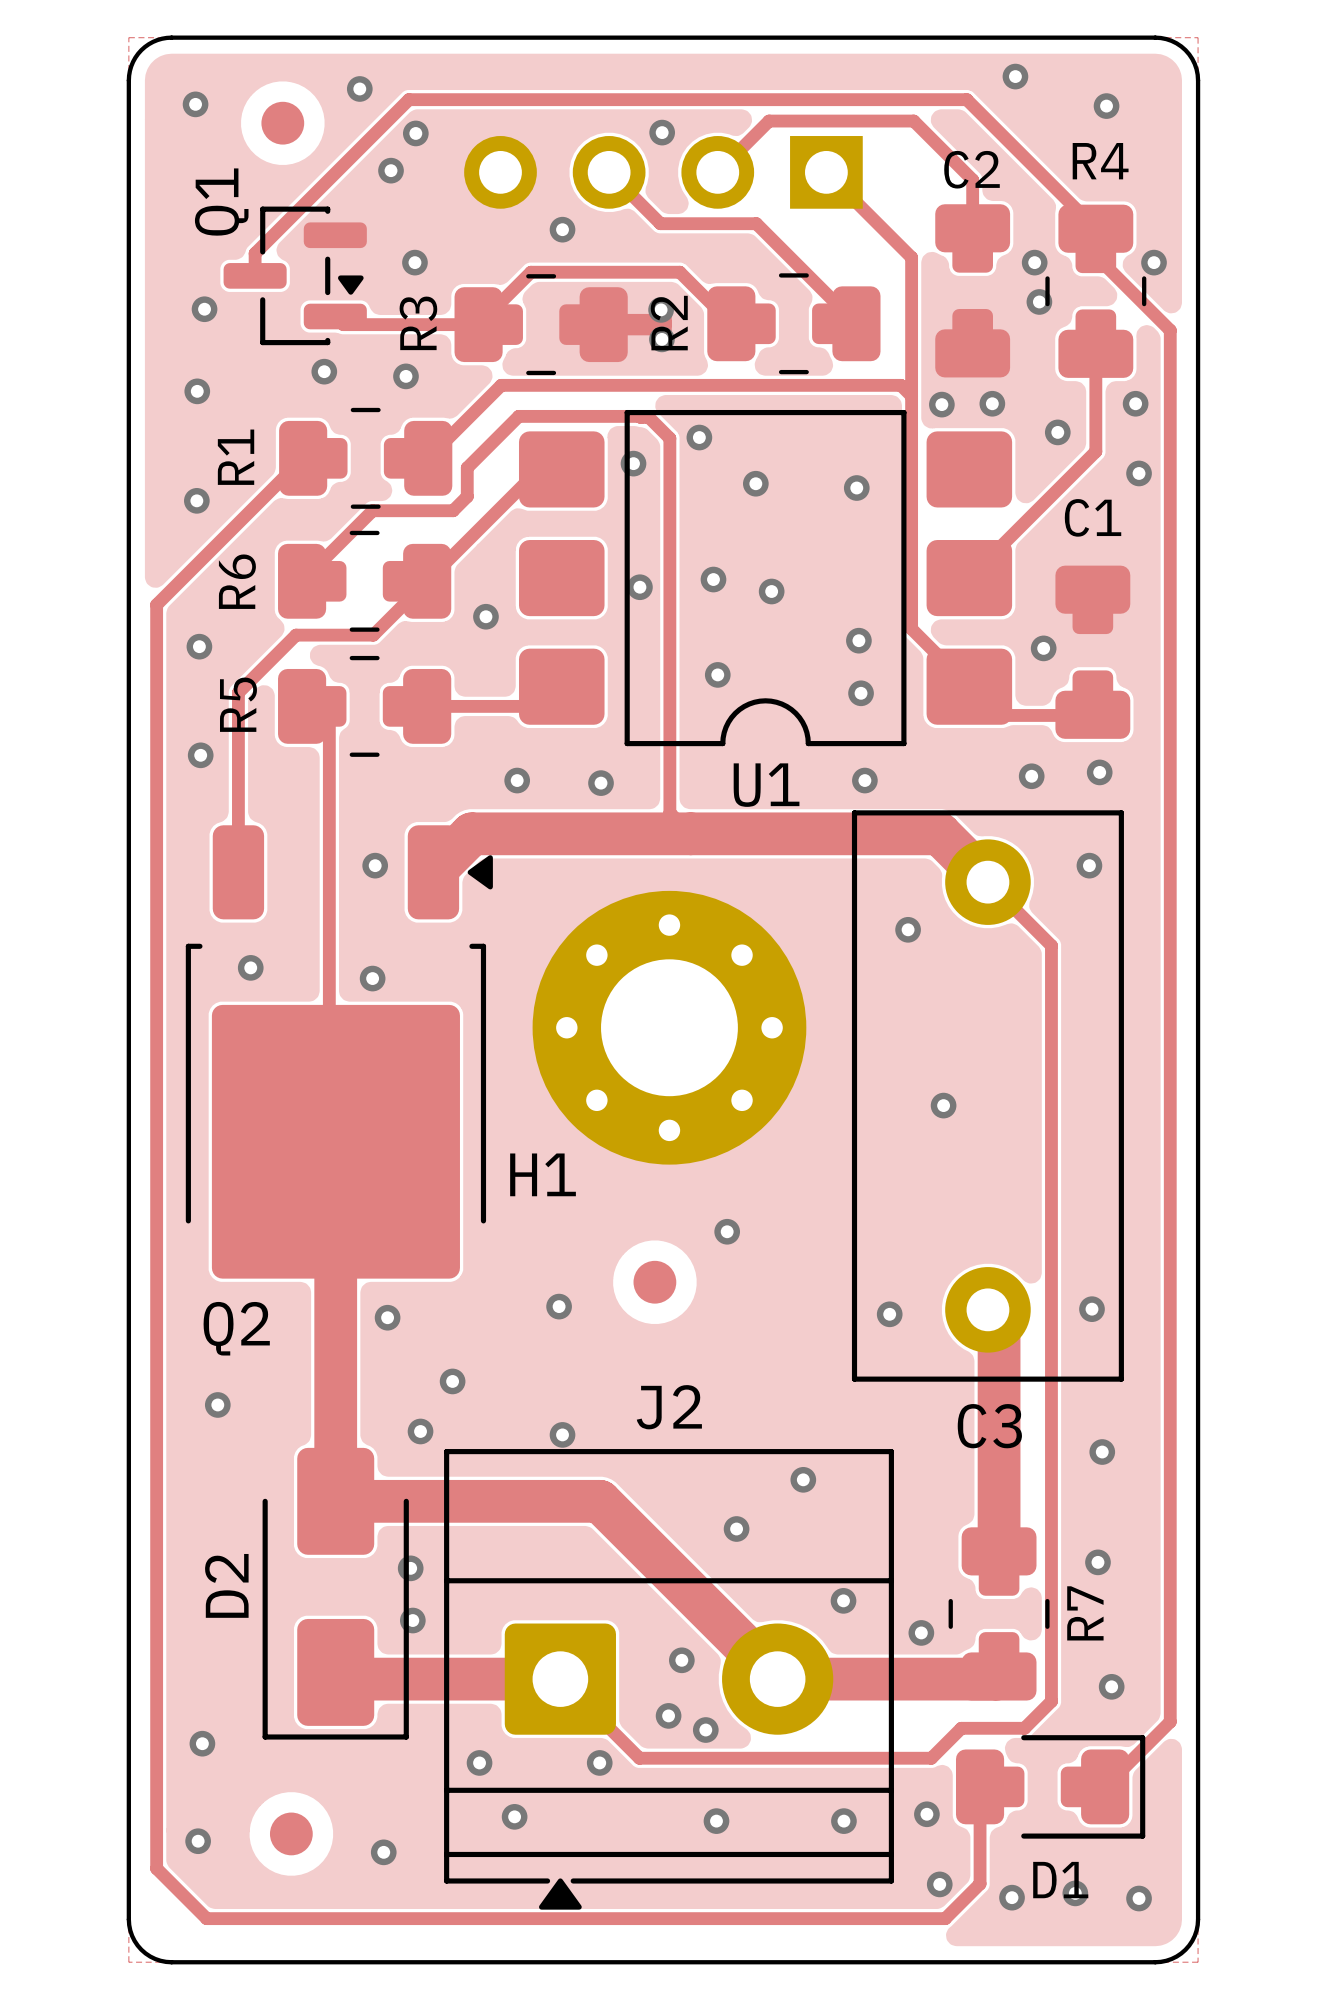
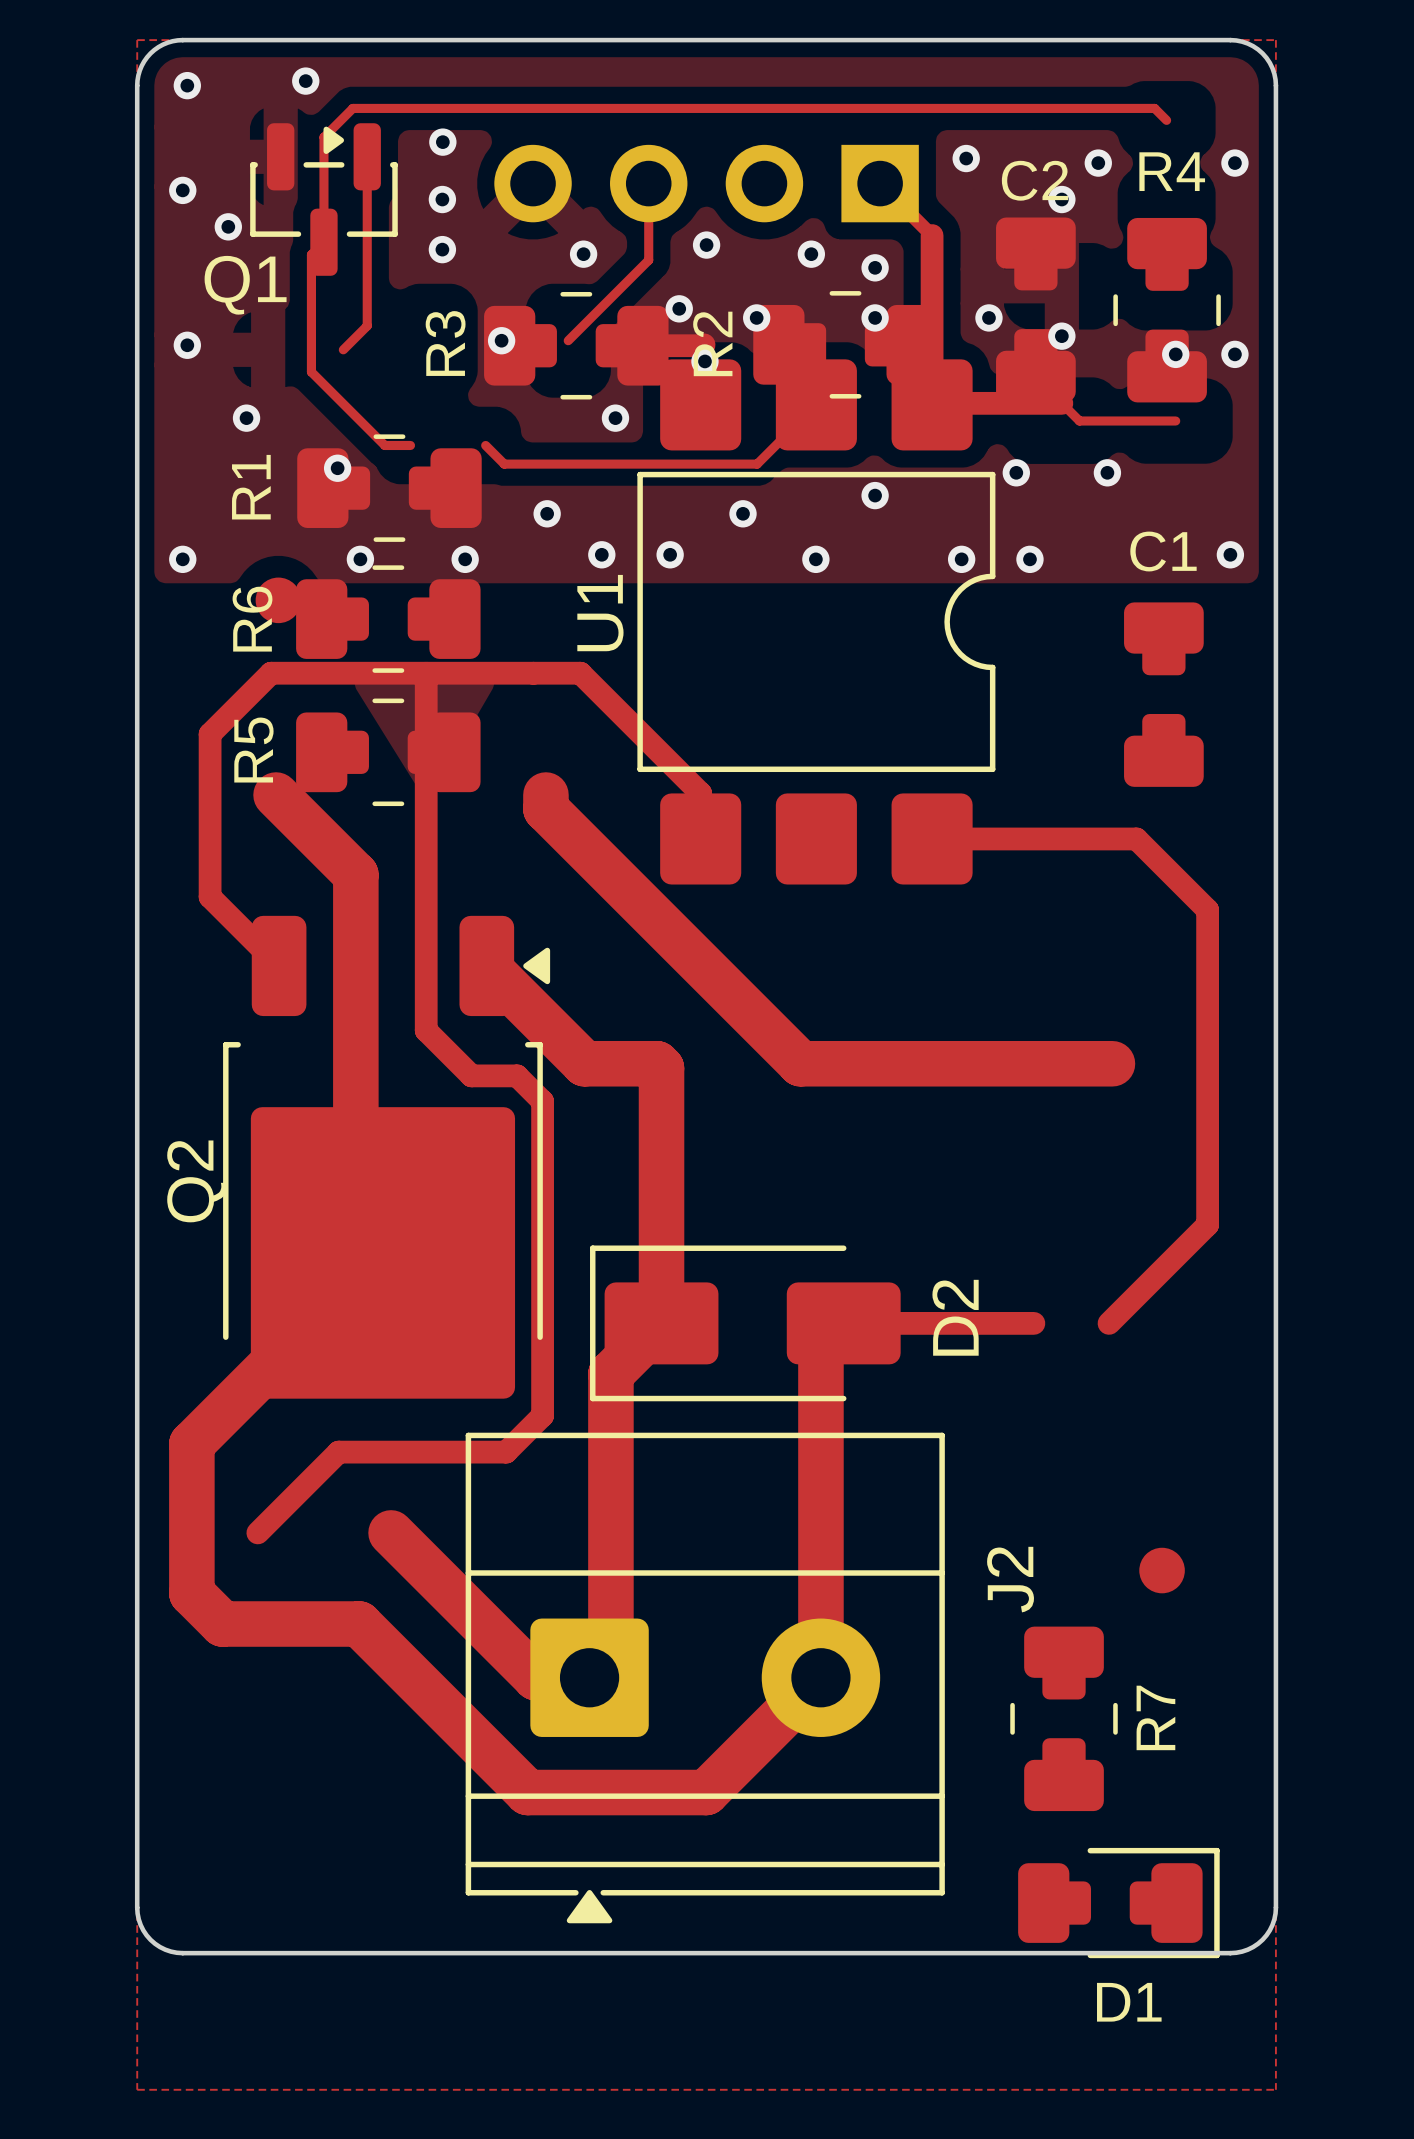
via: none -> (305, 81)
via: (1015, 76) -> none
via: (359, 88) -> none
via position: (195, 104) -> (187, 85)
via: (1106, 106) -> none
track: none -> (1166, 120) (1154, 108) (352, 108) (323, 137) (323, 242) (311, 254) (311, 372) (384, 445) (410, 445)
part: (282, 123) -> none
via: (662, 132) -> none
track: none -> (367, 156) (367, 325) (343, 349)
via: none -> (966, 158)
via: none -> (1098, 163)
via: none -> (1234, 163)
via position: (391, 170) -> (442, 199)
track: (609, 172) (660, 223) (756, 223) (856, 323) -> (648, 183) (648, 260) (568, 340)
track: (717, 172) (769, 121) (913, 121) (972, 179) (972, 228) -> none
via: none -> (182, 190)
via: none -> (1061, 199)
via: none -> (228, 226)
track: (875, 221) (911, 257) (911, 628) (998, 715) (1102, 715) -> (932, 235) (932, 404) (933, 403) (1061, 403) (1079, 421) (1175, 421)
track: (1095, 228) (966, 99) (408, 99) (255, 253) (255, 275) -> none
via position: (562, 229) -> (583, 254)
via: none -> (706, 245)
via: none -> (811, 254)
via: none -> (875, 267)
track: (1095, 255) (1170, 330) (1170, 1721) (1105, 1786) -> none
via position: (414, 262) -> (442, 249)
via: (1034, 262) -> none
via: (1154, 262) -> none
Q1 rotation: 0° (295, 275) -> 90° counterclockwise (323, 199)
Q1 position: (295, 275) -> (323, 199)
via: none -> (756, 317)
via: none -> (875, 317)
via: none -> (988, 317)
via: (1039, 301) -> none
via position: (204, 309) -> (187, 345)
via position: (661, 309) -> (679, 308)
via: none -> (1061, 336)
track: (335, 316) (343, 324) (478, 324) (530, 272) (679, 272) (731, 323) -> none
via: none -> (501, 340)
via: none -> (1175, 354)
via: none -> (1234, 354)
track: (1095, 353) (1095, 451) (969, 578) -> none
via: (324, 371) -> none
via: (405, 376) -> none
track: none -> (816, 404) (757, 464) (504, 464) (485, 445)
via position: (197, 391) -> (246, 418)
via: none -> (615, 418)
track: (911, 396) (900, 385) (501, 385) (428, 458) -> none
via: (992, 403) -> none
via: (1135, 403) -> none
via: (941, 404) -> none
via position: (1057, 432) -> (1107, 472)
via: (699, 437) -> none
via: none -> (337, 468)
via: none -> (1016, 472)
track: (303, 458) (156, 604) (156, 1868) (206, 1918) (945, 1918) (980, 1883) (980, 1786) -> none
via: (633, 463) -> none
via: none -> (875, 495)
track: (561, 469) (539, 469) (373, 635) (296, 635) (238, 692) (238, 872) -> none
via position: (1139, 473) -> (1230, 554)
via: none -> (547, 513)
via: none -> (743, 513)
via: (755, 483) -> none
via: (856, 488) -> none
via position: (196, 500) -> (182, 559)
via: none -> (601, 554)
via: none -> (670, 554)
via: none -> (360, 559)
via: none -> (465, 559)
via: none -> (815, 559)
via: none -> (961, 559)
via: none -> (1029, 559)
part: none -> (278, 600)
U1 rotation: 0° (765, 578) -> 90° counterclockwise (816, 621)
via: (713, 579) -> none
track: (302, 581) (372, 510) (453, 510) (467, 496) (467, 467) (518, 416) (648, 417) (669, 438) (669, 812) (690, 833) -> none
via: (639, 587) -> none
via: (771, 591) -> none
via: (485, 616) -> none
track: none -> (426, 673) (426, 1030) (471, 1075) (517, 1075) (542, 1101) (542, 1415) (506, 1452) (338, 1452) (257, 1532)
via: (858, 640) -> none
via: (199, 646) -> none
via: (1043, 648) -> none
via: (717, 674) -> none
track: (561, 686) (542, 706) (427, 706) -> none
via: (861, 693) -> none
track: (329, 706) (329, 1135) (335, 1141) (335, 1501) (599, 1501) (777, 1679) (996, 1679) (999, 1676) -> none
track: none -> (276, 795) (355, 874) (355, 1225) (382, 1252) (191, 1443) (191, 1593) (222, 1624) (359, 1624) (527, 1792) (706, 1792) (820, 1677) (820, 1346) (843, 1323) (1033, 1323)
track: none -> (545, 795) (545, 809) (800, 1063) (1112, 1063)
via: (200, 755) -> none
via: (1099, 772) -> none
via: (1031, 776) -> none
via: (517, 780) -> none
via: (864, 780) -> none
via: (601, 783) -> none
U1 name position: U1 (766, 785) -> U1 (600, 613)
track: none -> (700, 838) (700, 793) (580, 673) (271, 673) (210, 734) (210, 896) (279, 965)
track: none -> (932, 838) (1136, 838) (1207, 910) (1207, 1224) (1109, 1323)
via: (375, 865) -> none
via: (1089, 865) -> none
track: (433, 872) (471, 833) (939, 833) (1051, 945) (1051, 1701) (1024, 1728) (961, 1728) (931, 1758) (639, 1758) (560, 1679) (342, 1679) (335, 1672) -> none
track: none -> (486, 965) (584, 1063) (656, 1063) (661, 1068) (661, 1323) (610, 1373) (610, 1656) (589, 1677) (535, 1677) (391, 1532)
via: (908, 929) -> none
via: (250, 967) -> none
via: (372, 978) -> none
H1: (669, 1027) -> none
Q2 position: (339, 1051) -> (386, 1157)
C3: (987, 1096) -> none
via: (943, 1105) -> none
via: (727, 1231) -> none
part: (654, 1282) -> none
via: (559, 1306) -> none
track: (987, 1309) (999, 1320) (999, 1551) -> none
via: (1091, 1309) -> none
via: (889, 1314) -> none
via: (387, 1317) -> none
Q2 name rotation: 0° (236, 1328) -> 90° counterclockwise (196, 1181)
Q2 name position: Q2 (236, 1328) -> Q2 (196, 1181)
via: (452, 1381) -> none
via: (217, 1404) -> none
J2 name rotation: 0° (669, 1407) -> 90° counterclockwise (1010, 1579)
J2 name position: J2 (669, 1407) -> J2 (1010, 1579)
via: (420, 1431) -> none
via: (562, 1434) -> none
via: (1102, 1452) -> none
part: none -> (1162, 1570)
via: (803, 1479) -> none
via: (736, 1529) -> none
via: (1097, 1562) -> none
via: (410, 1568) -> none
D2 name position: D2 (226, 1585) -> D2 (955, 1317)
D2 rotation: 0° (335, 1593) -> 90° clockwise (745, 1323)
D2 position: (335, 1593) -> (745, 1323)
via: (843, 1600) -> none
via: (412, 1620) -> none
via: (921, 1632) -> none
via: (681, 1660) -> none
J2 position: (669, 1679) -> (705, 1677)
via: (1111, 1686) -> none
via: (668, 1715) -> none
via: (705, 1730) -> none
via: (202, 1743) -> none
via: (479, 1762) -> none
via: (599, 1762) -> none
board edge: (128, 1791) (130, 1930) (137, 1945) (145, 1953) (160, 1960) (171, 1962) (1160, 1961) (1176, 1956) (1185, 1949) (1196, 1930) (1198, 1791) -> (137, 1907) (140, 1925) (150, 1939) (165, 1949) (182, 1953) (1230, 1953) (1247, 1949) (1262, 1939) (1272, 1925) (1275, 1907)
via: (926, 1814) -> none
via: (514, 1816) -> none
via: (716, 1821) -> none
via: (843, 1821) -> none
part: (291, 1833) -> none
via: (198, 1841) -> none
via: (383, 1852) -> none
via: (939, 1884) -> none
via: (1075, 1893) -> none
via: (1012, 1897) -> none
via: (1139, 1898) -> none

